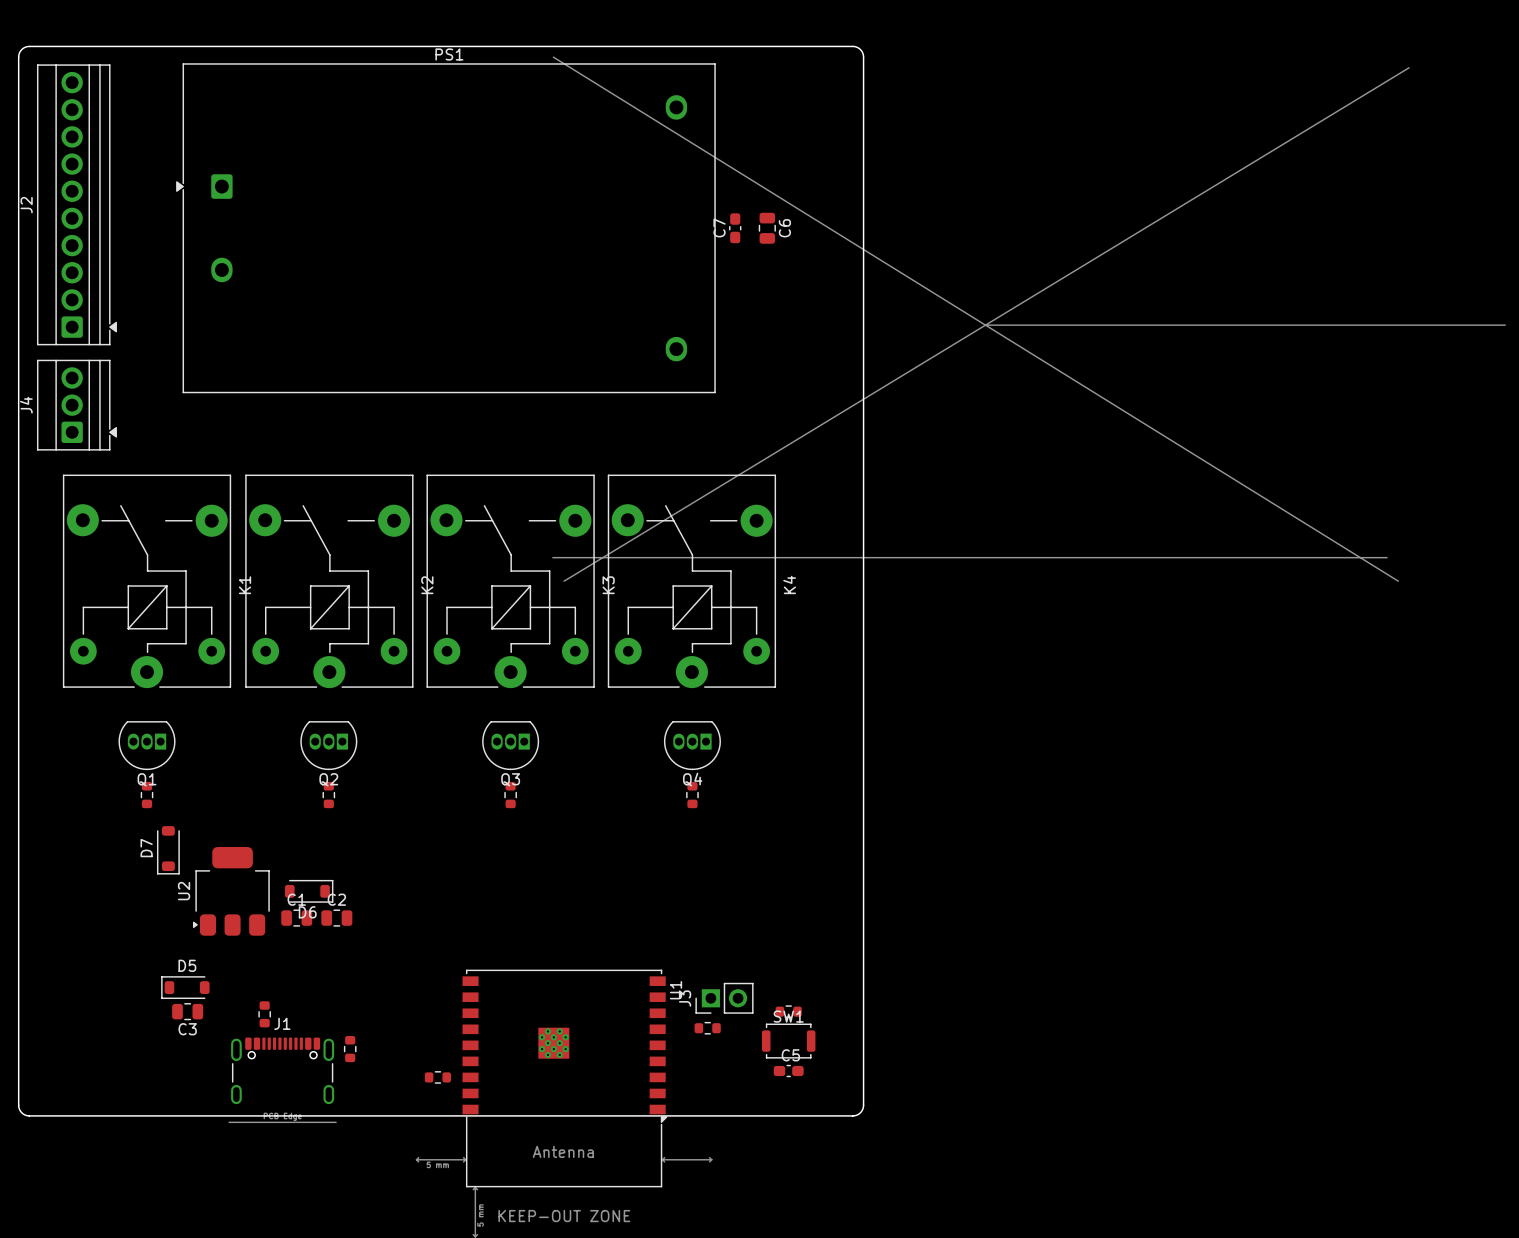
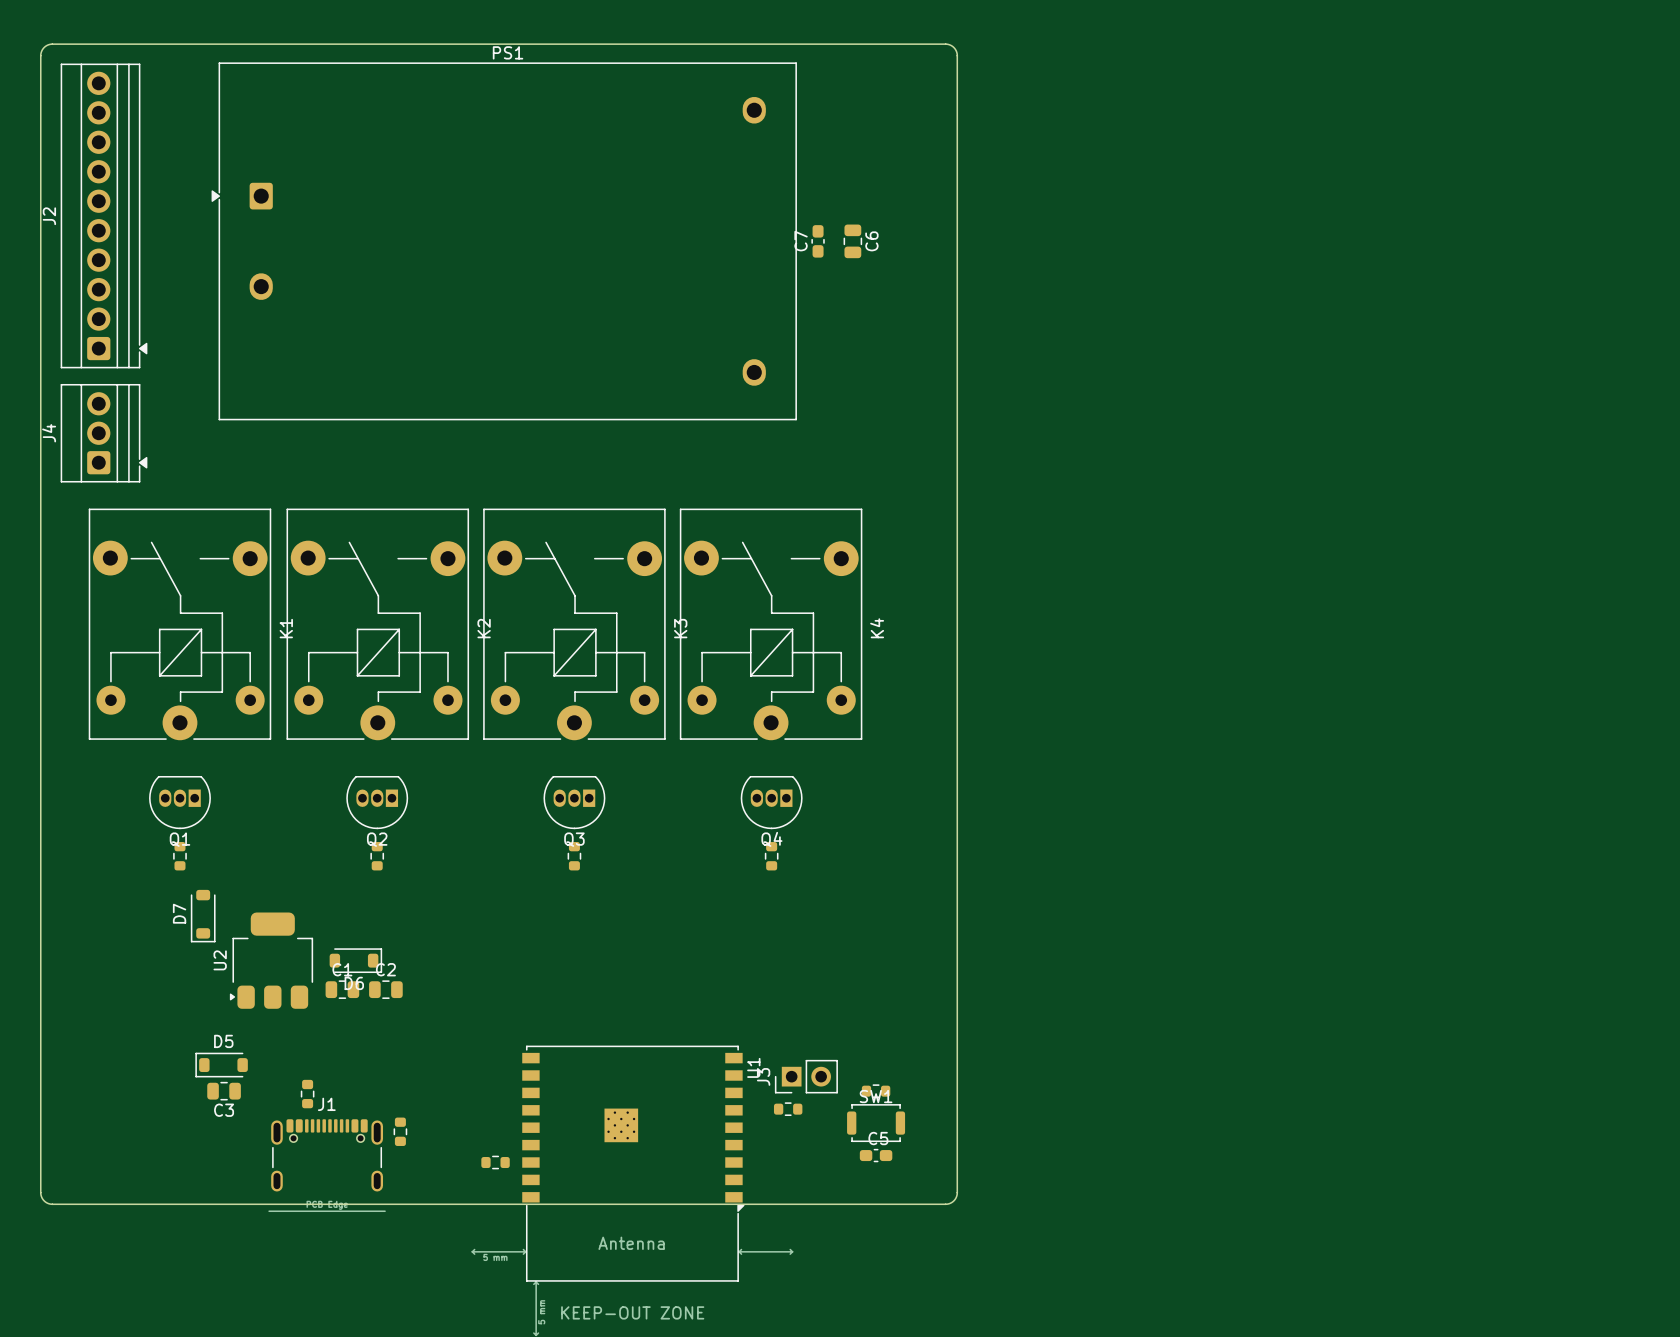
line: (553, 57) (1398, 581) -> none
line: (1408, 67) (564, 581) -> none
line: (985, 325) (1505, 325) -> none
line: (552, 557) (1387, 557) -> none

